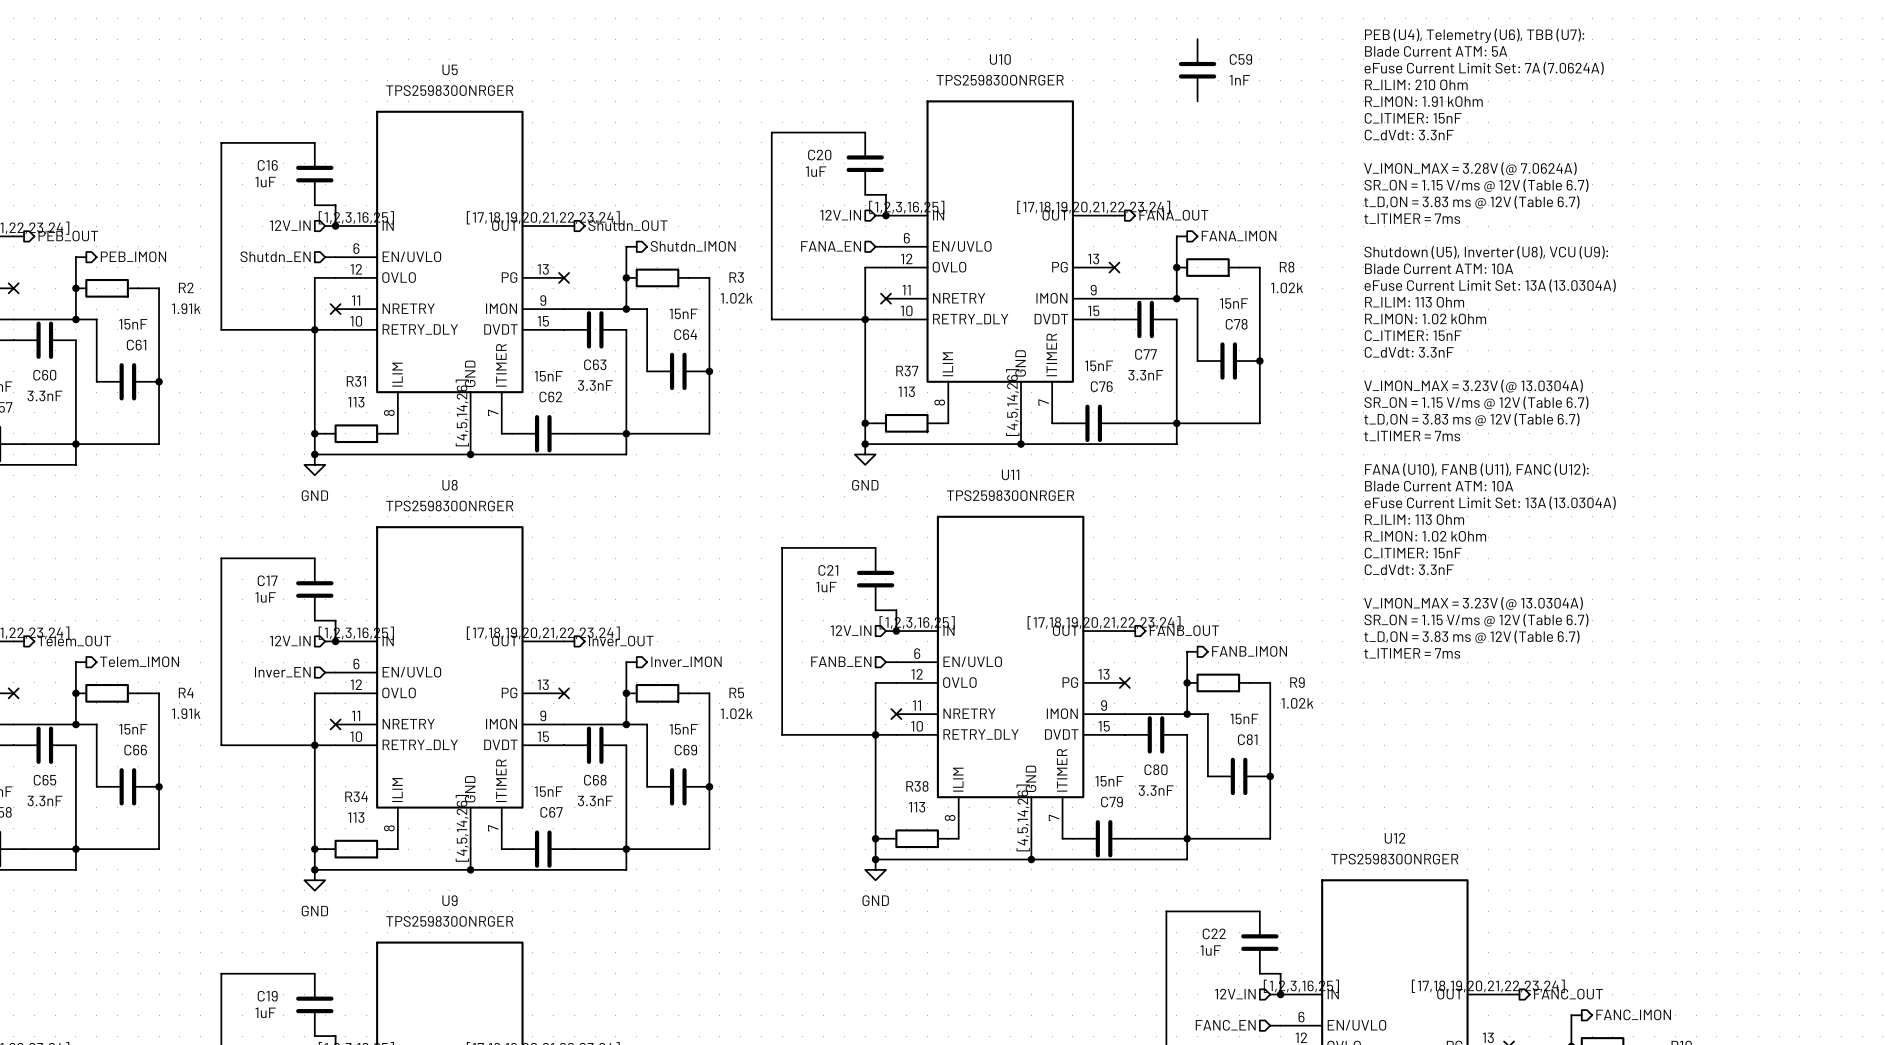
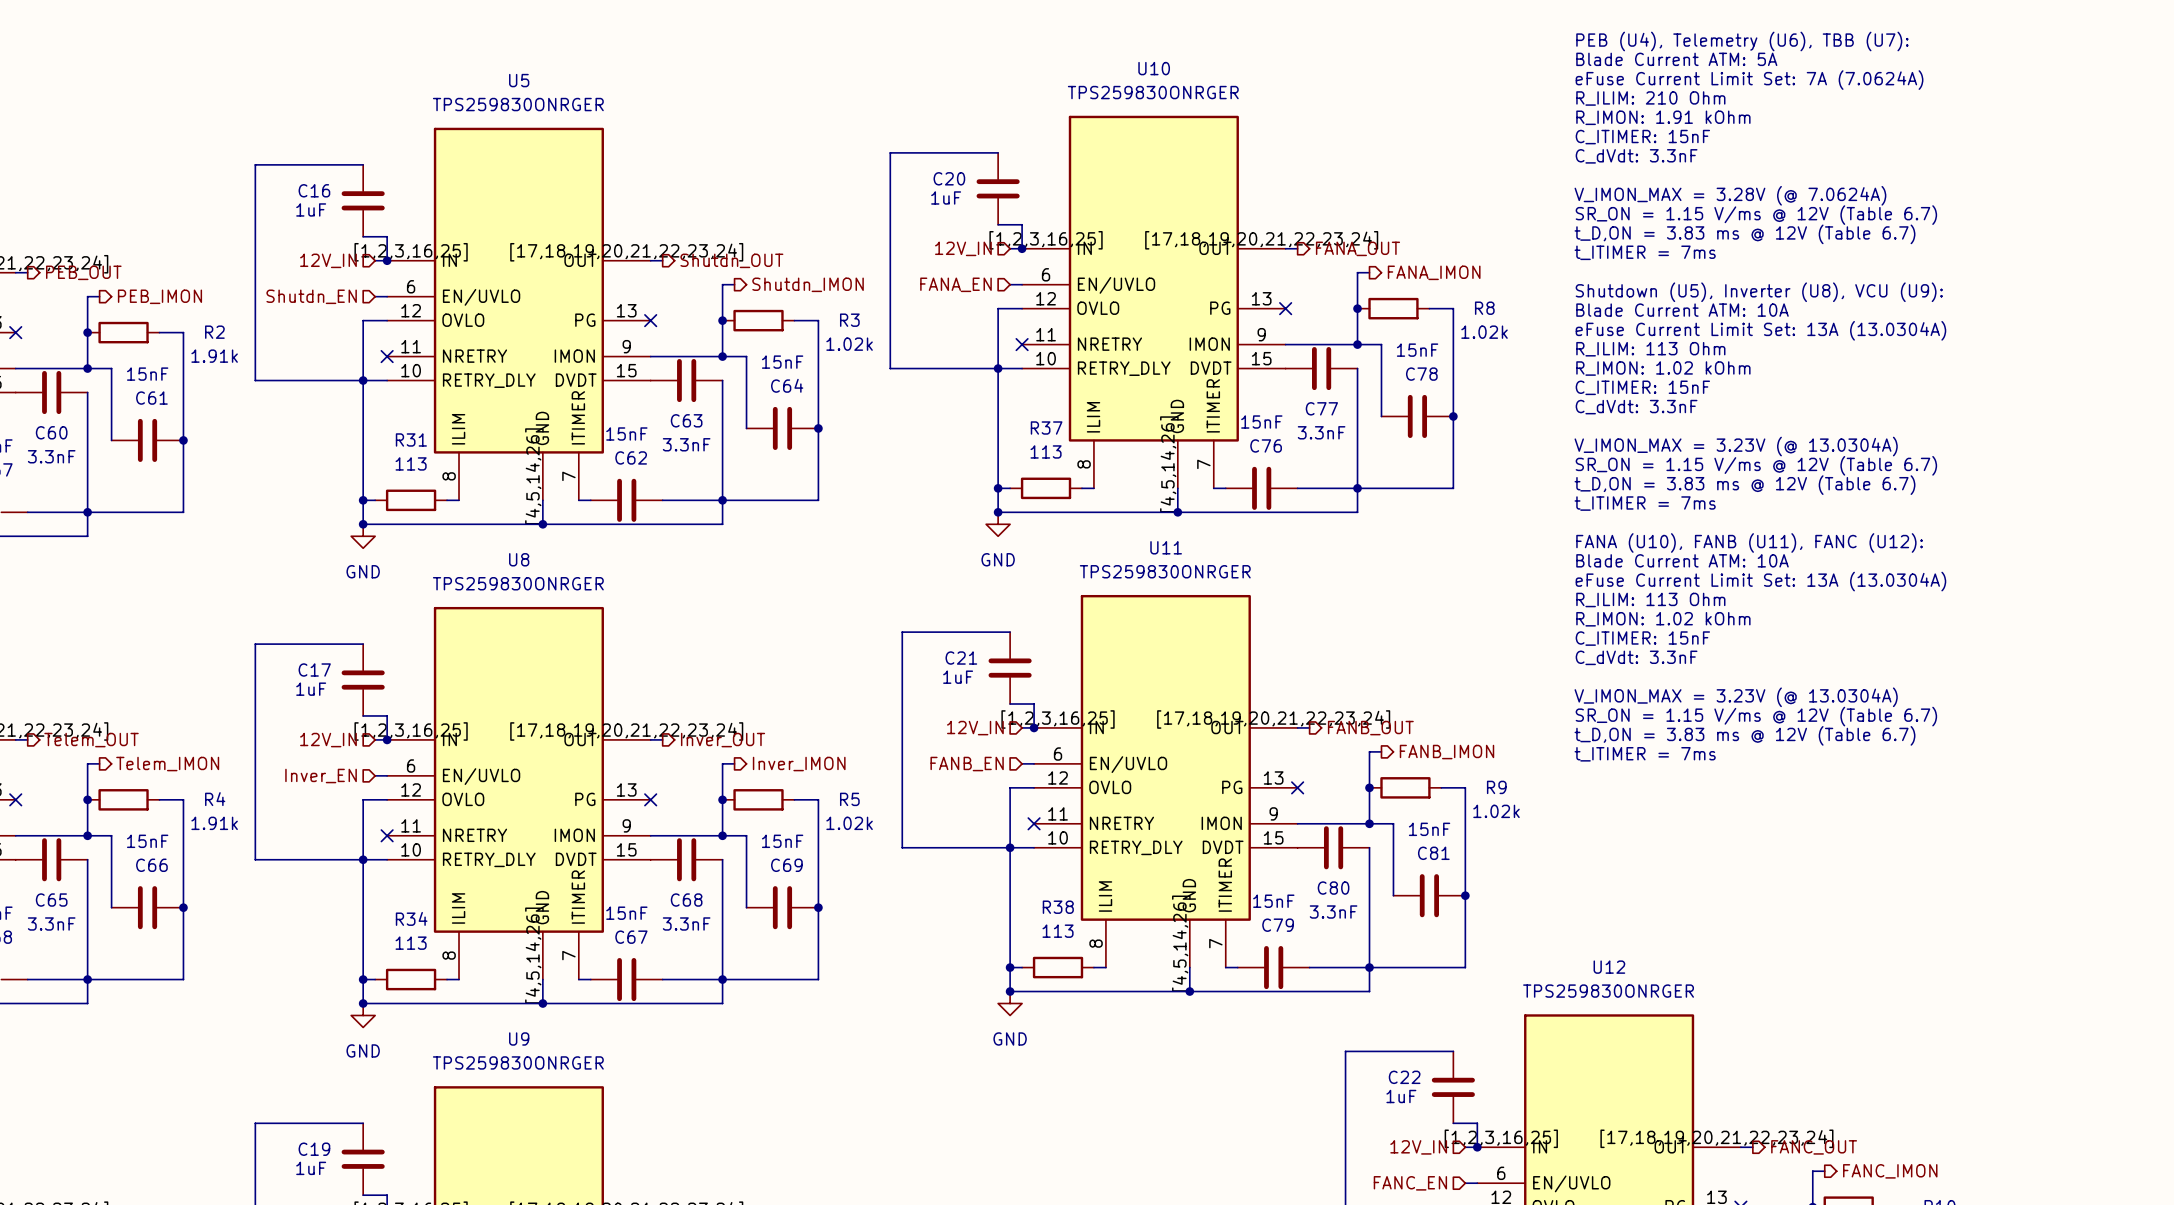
C59: 1nF (1197, 70) -> none

